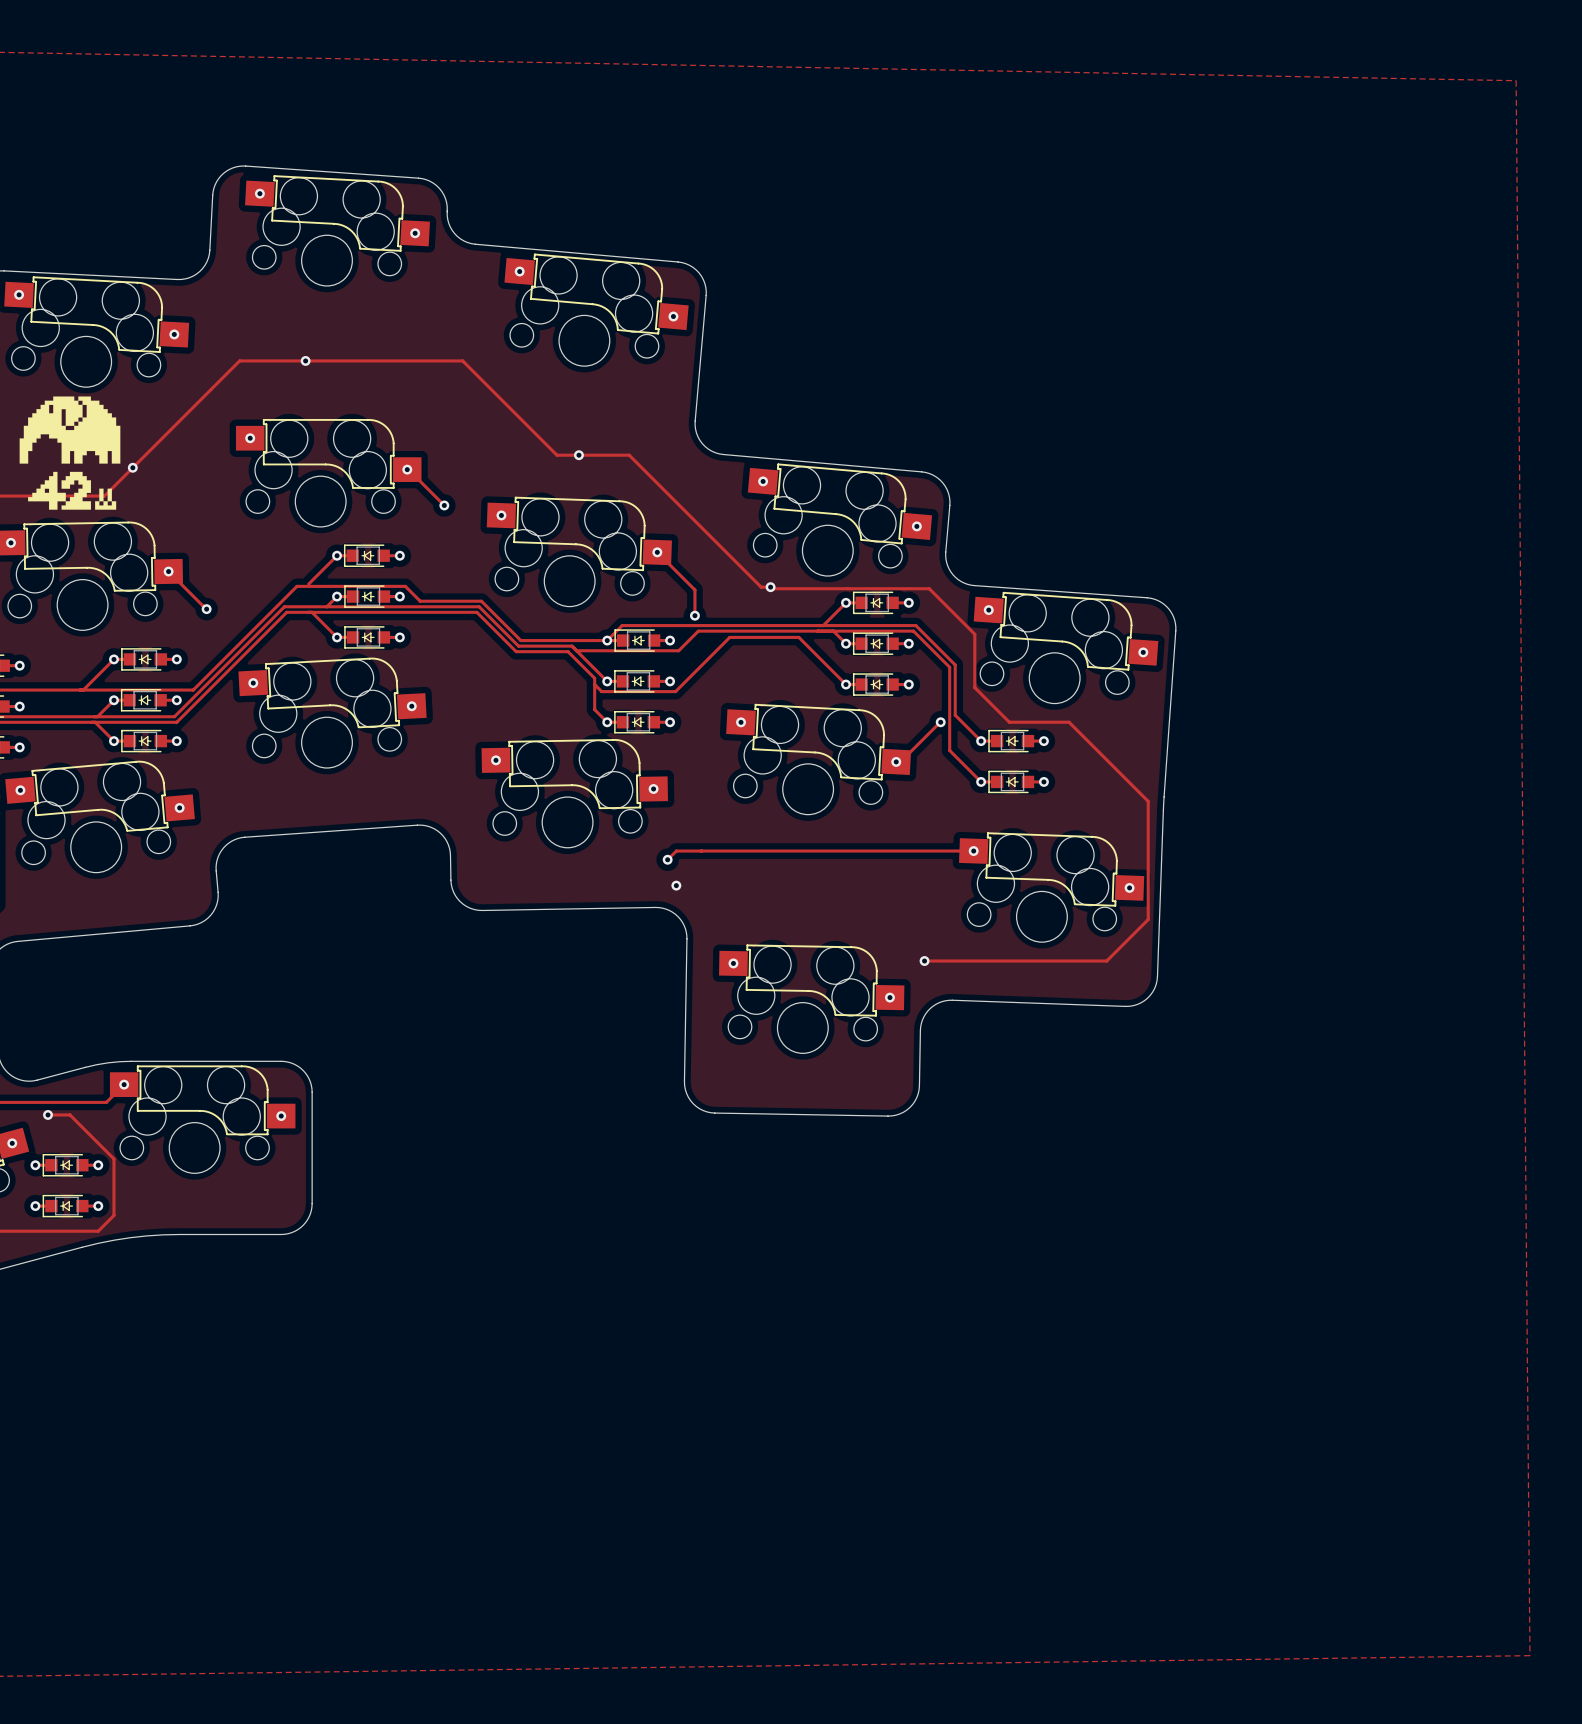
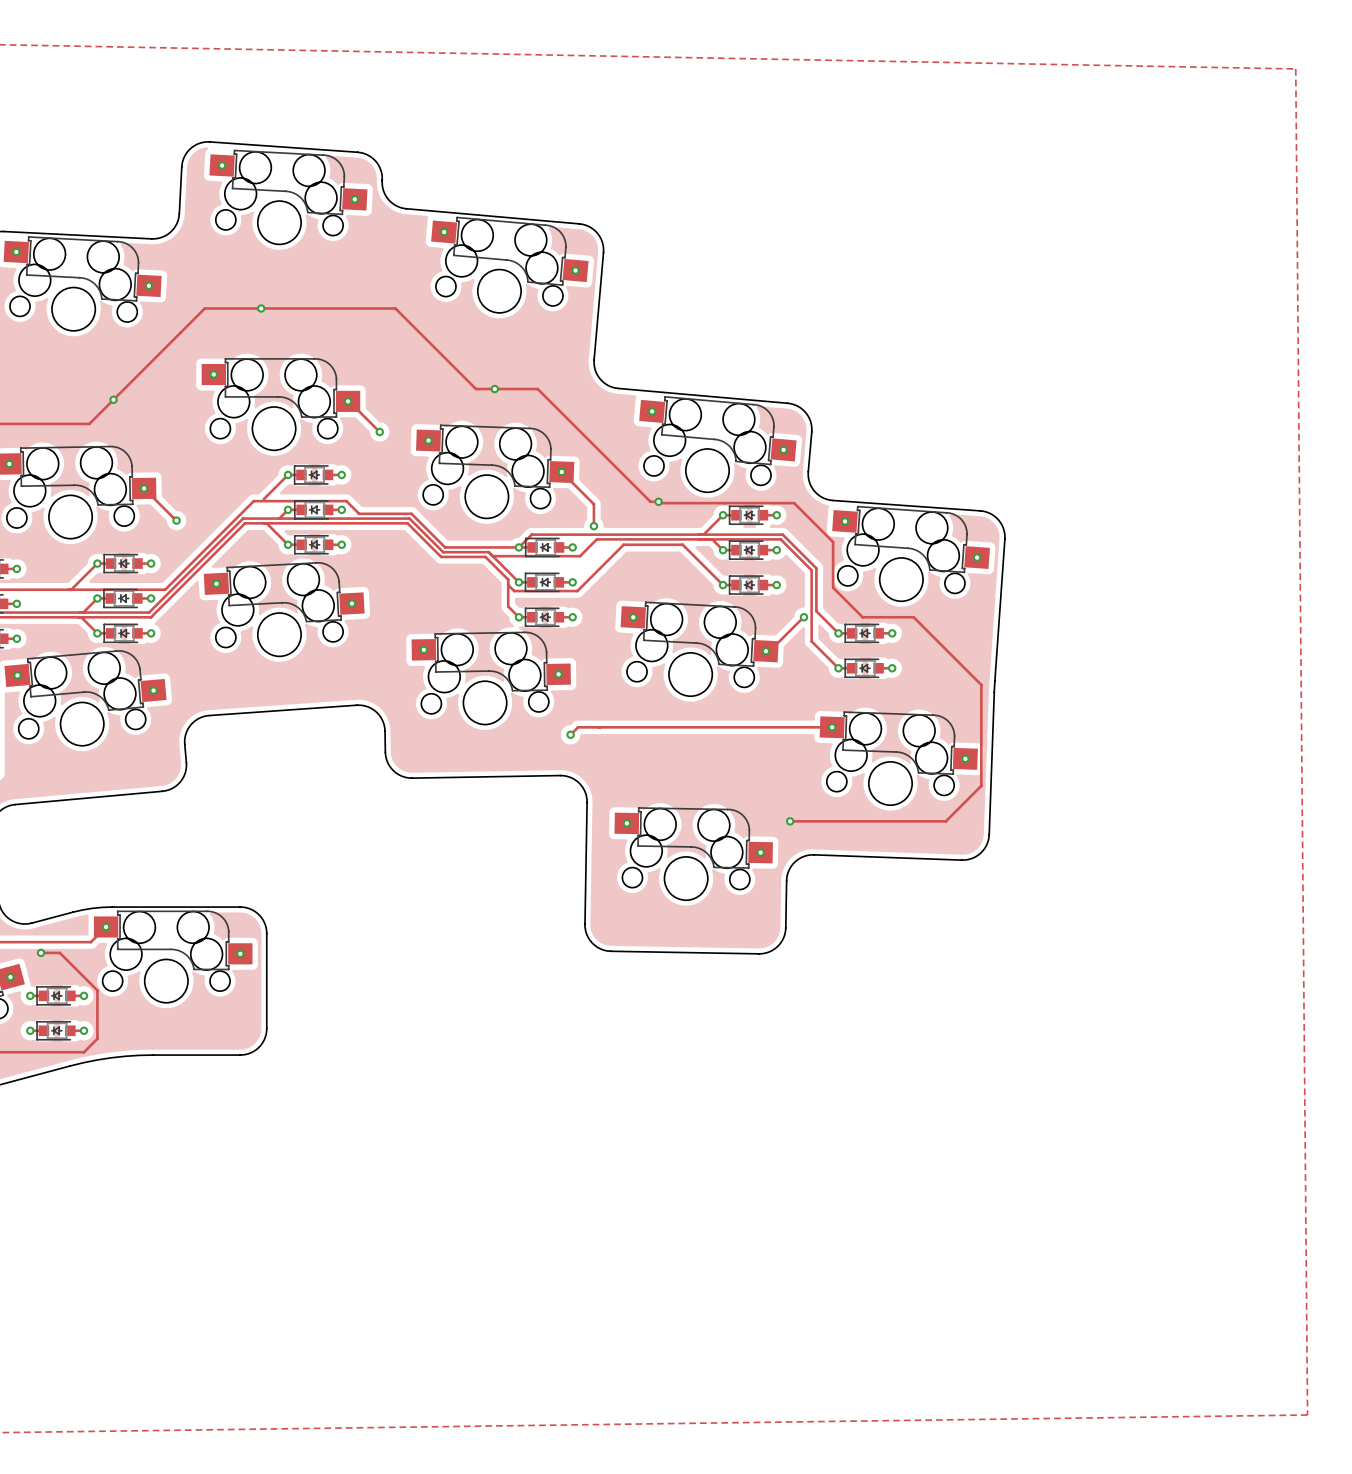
drawing: [19, 396, 121, 510] -> none
via: (676, 885) -> none

